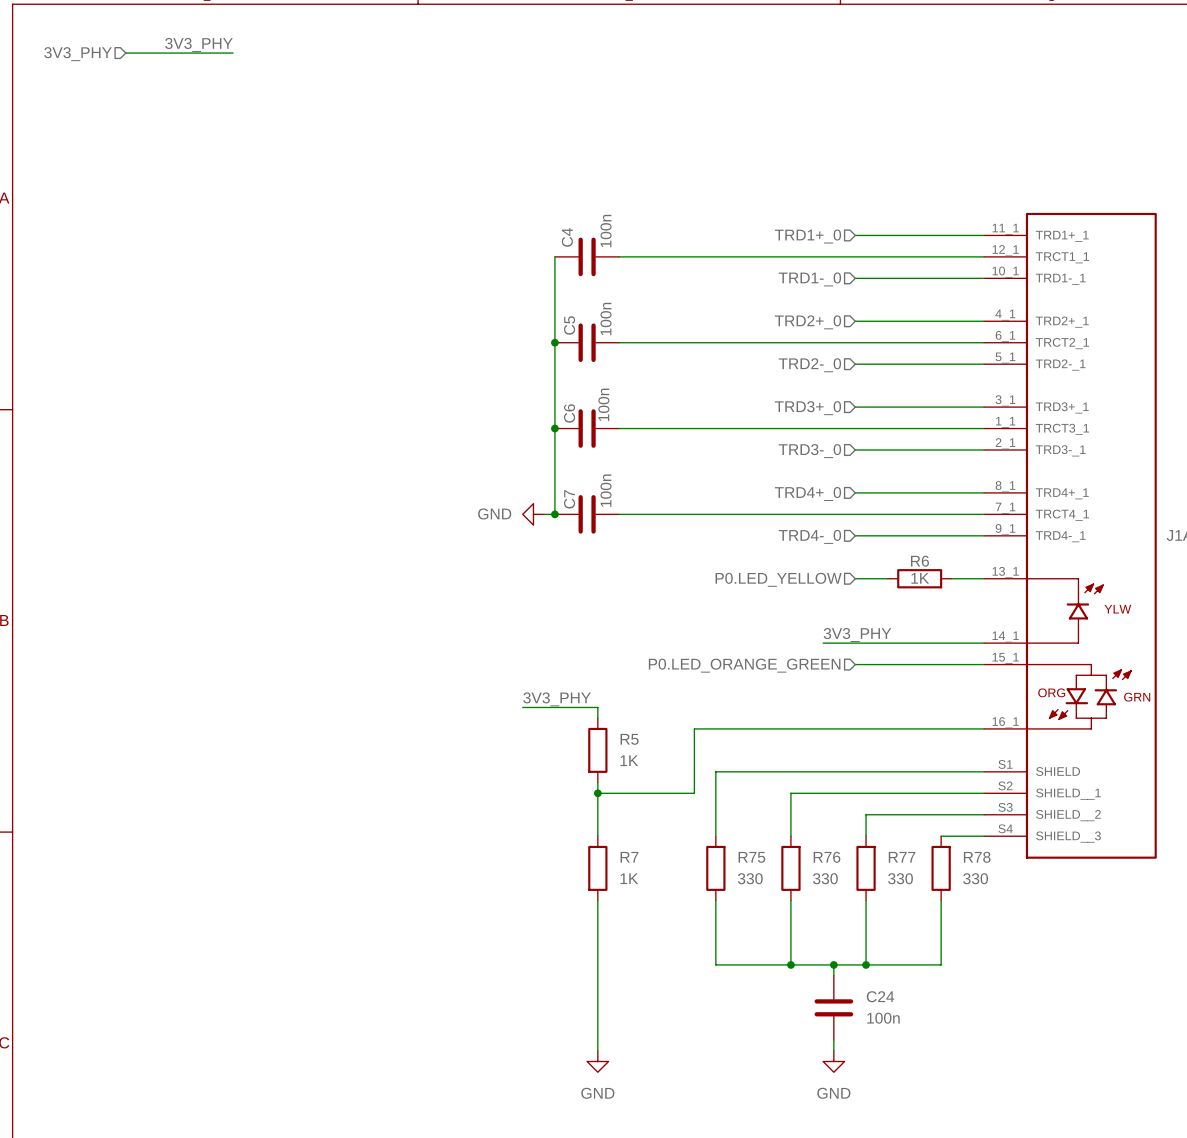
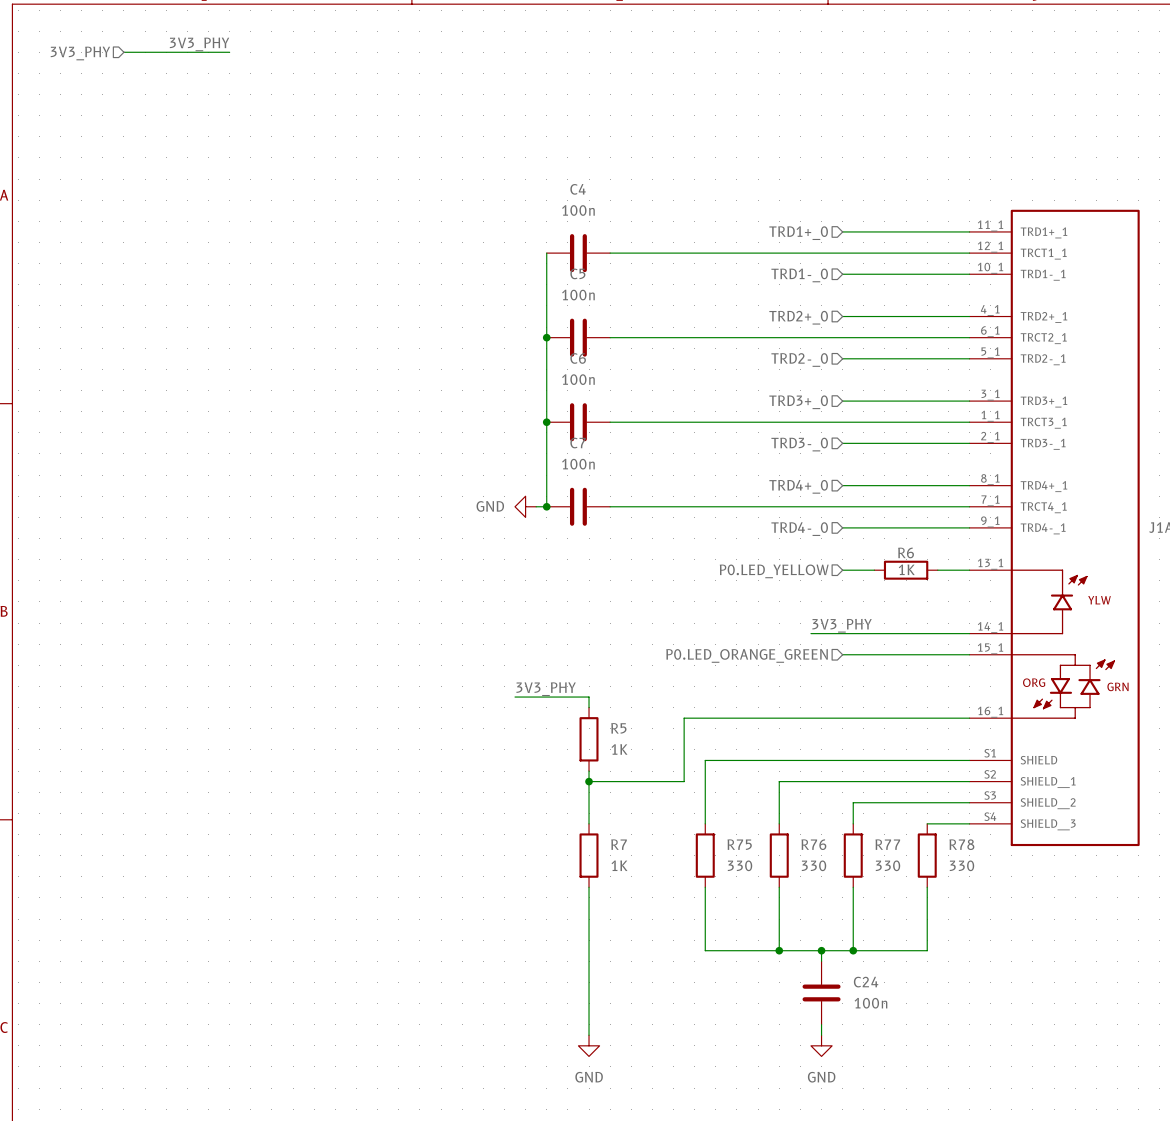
C4 value rotation: 0° (606, 231) -> 90° clockwise (578, 210)
C4 name rotation: 0° (567, 237) -> 90° clockwise (578, 189)
C4 name position: C4 (567, 237) -> C4 (578, 189)
C5 value rotation: 0° (606, 319) -> 90° clockwise (578, 295)
C5 name rotation: 0° (569, 325) -> 90° clockwise (577, 273)
C5 name position: C5 (569, 325) -> C5 (577, 273)
C6 value rotation: 0° (603, 404) -> 90° clockwise (578, 379)
C6 name rotation: 0° (569, 413) -> 90° clockwise (578, 358)
C6 name position: C6 (569, 413) -> C6 (578, 358)
C7 value rotation: 0° (606, 490) -> 90° clockwise (578, 464)
C7 name rotation: 0° (569, 499) -> 90° clockwise (578, 443)
C7 name position: C7 (569, 499) -> C7 (578, 443)

